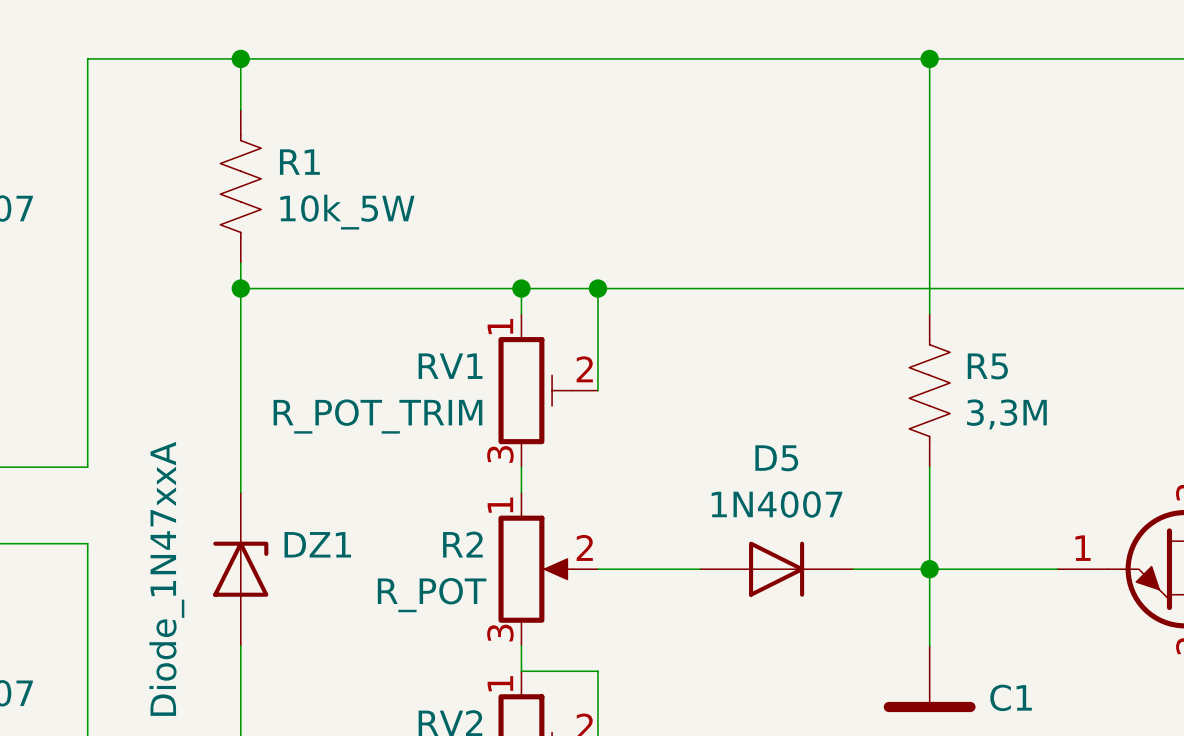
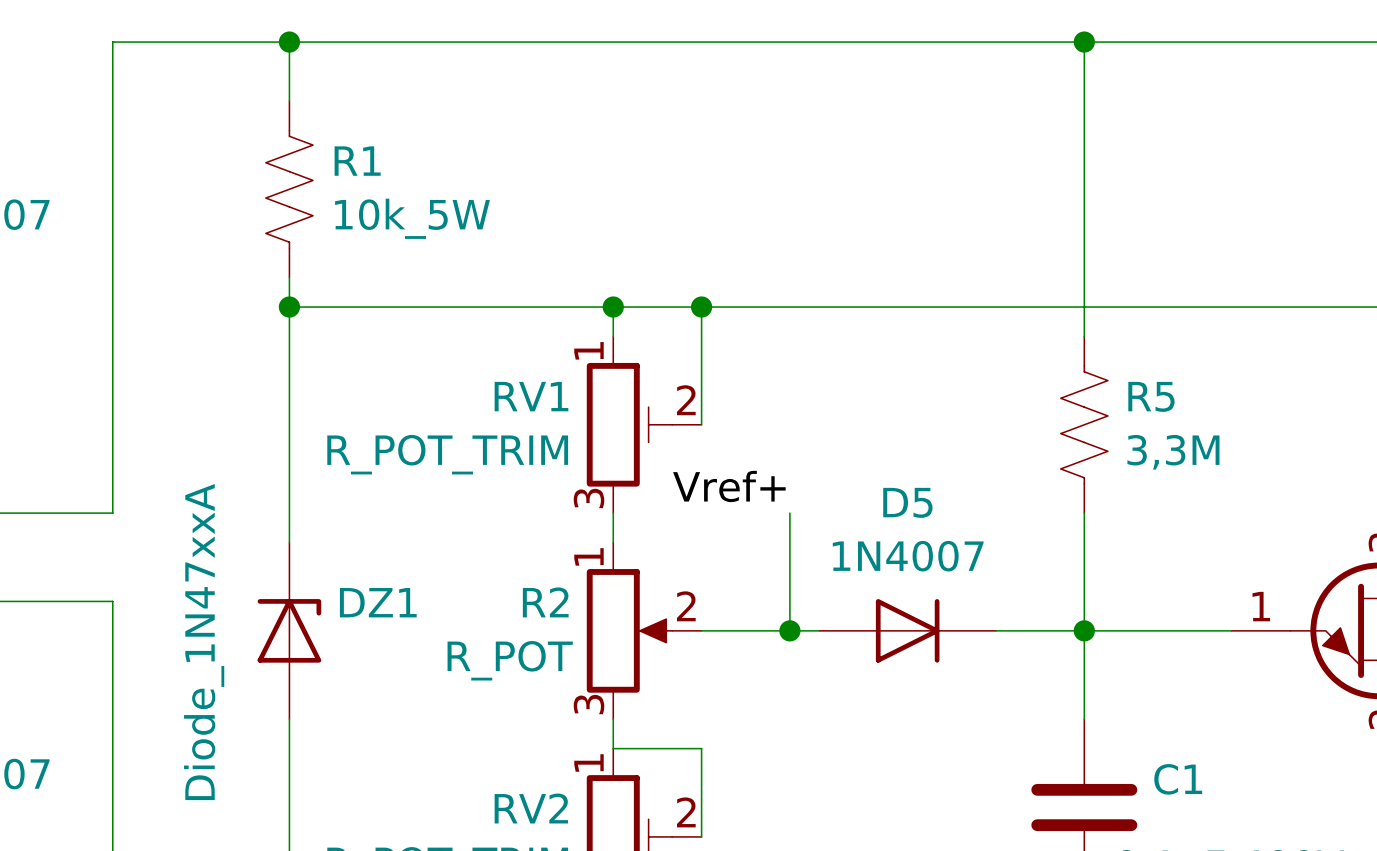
label: none -> Vref+ (729, 486)
wire: none -> (789, 513) (789, 630)
junction: none -> (789, 630)

